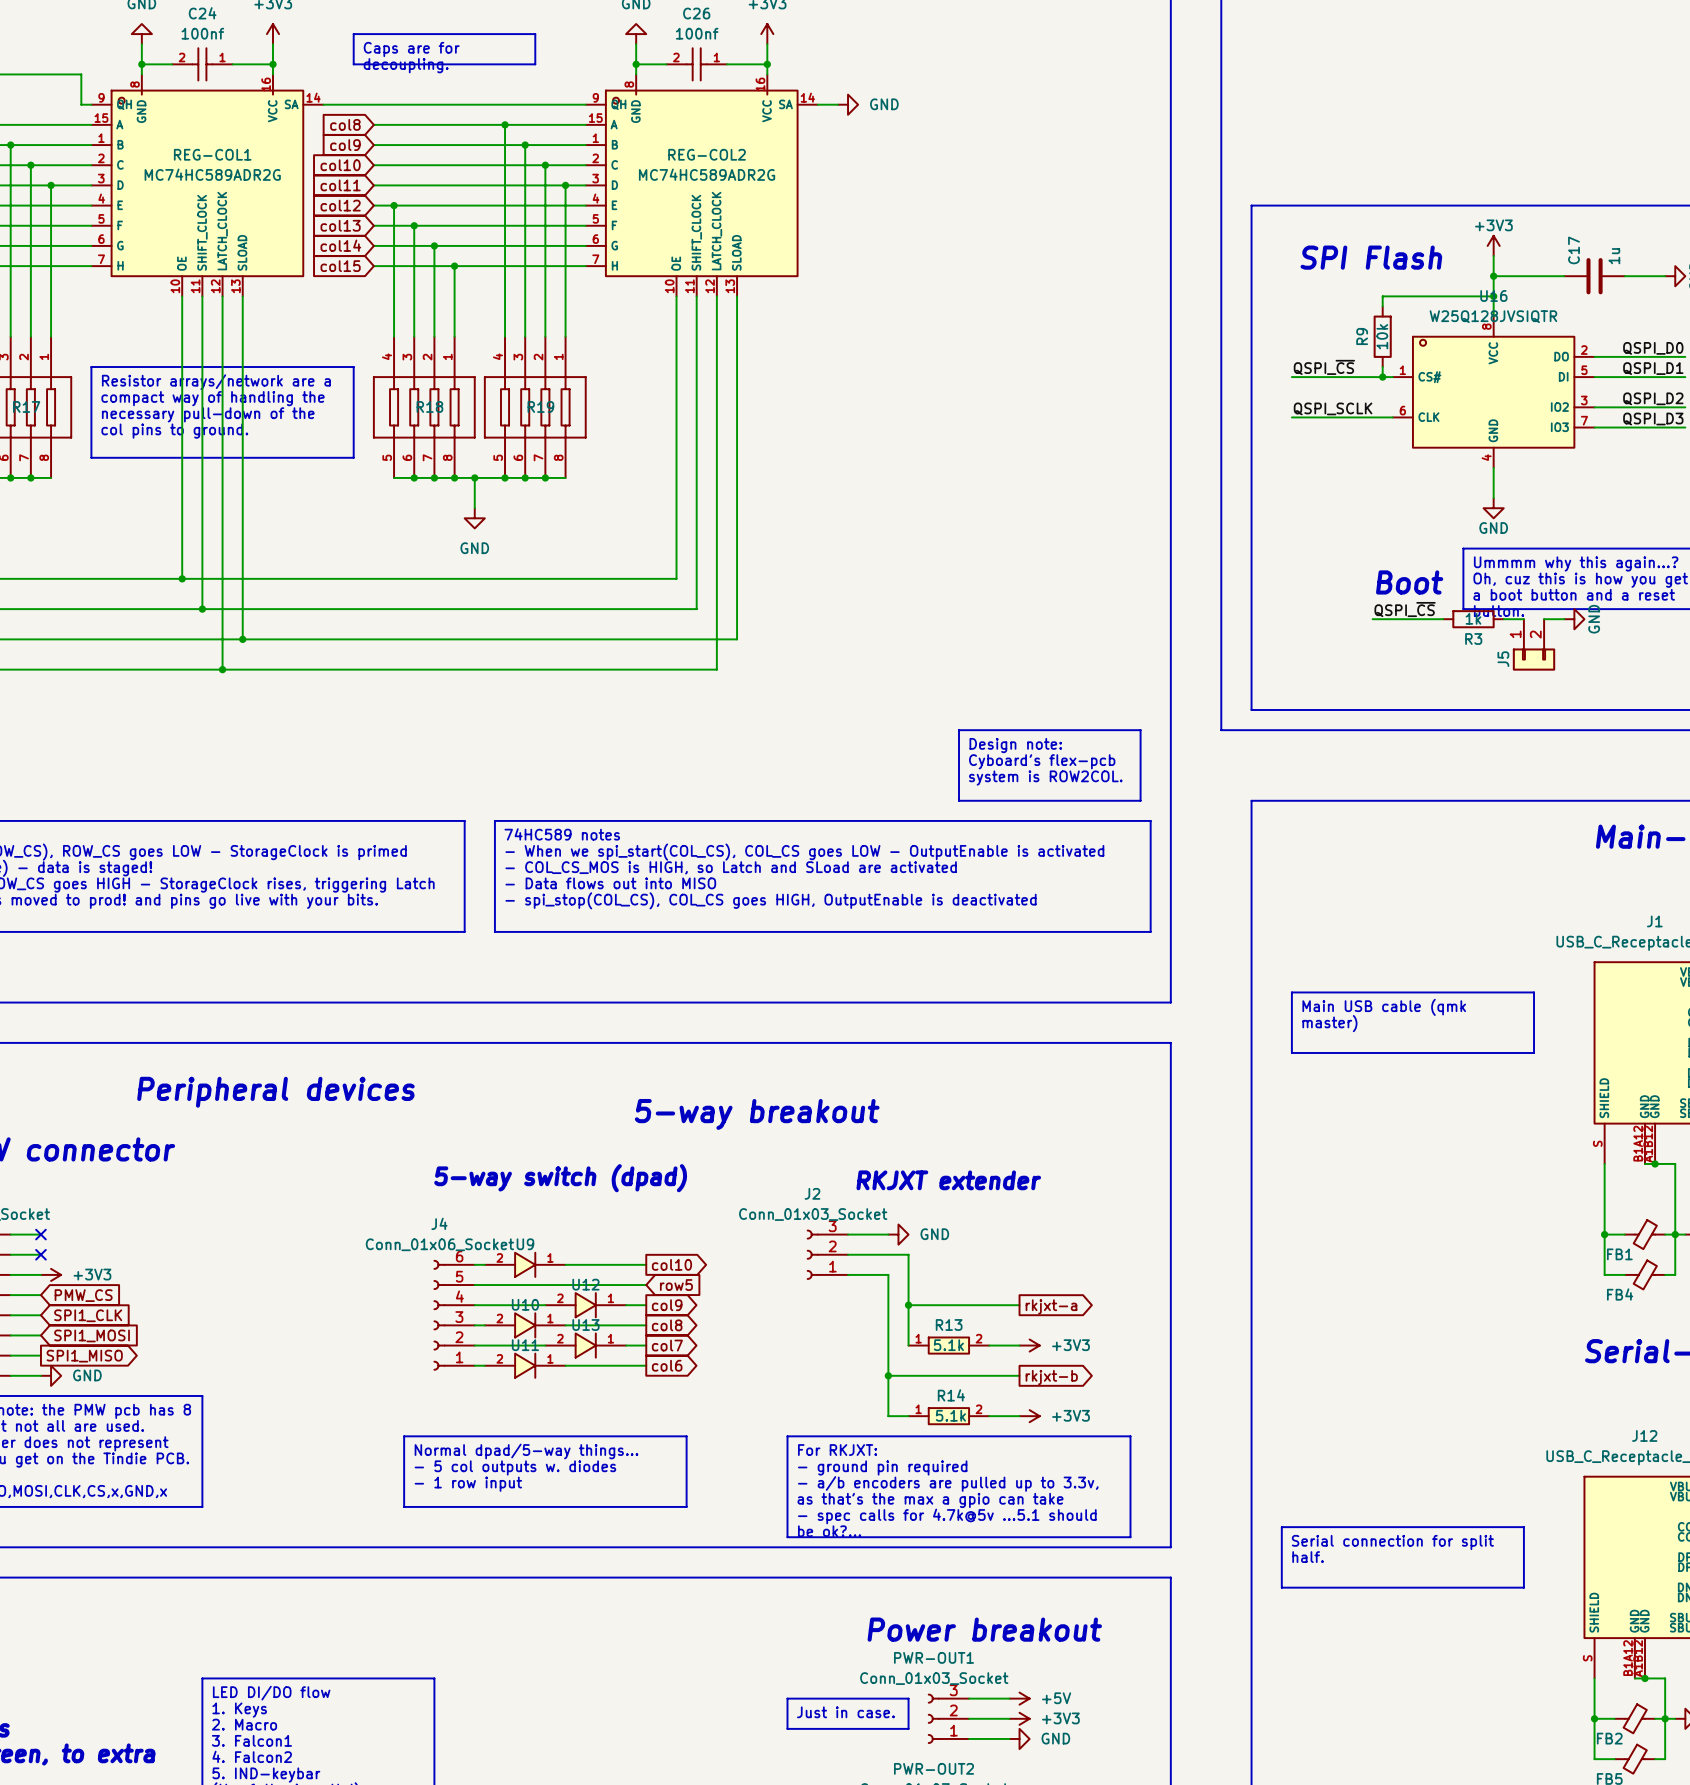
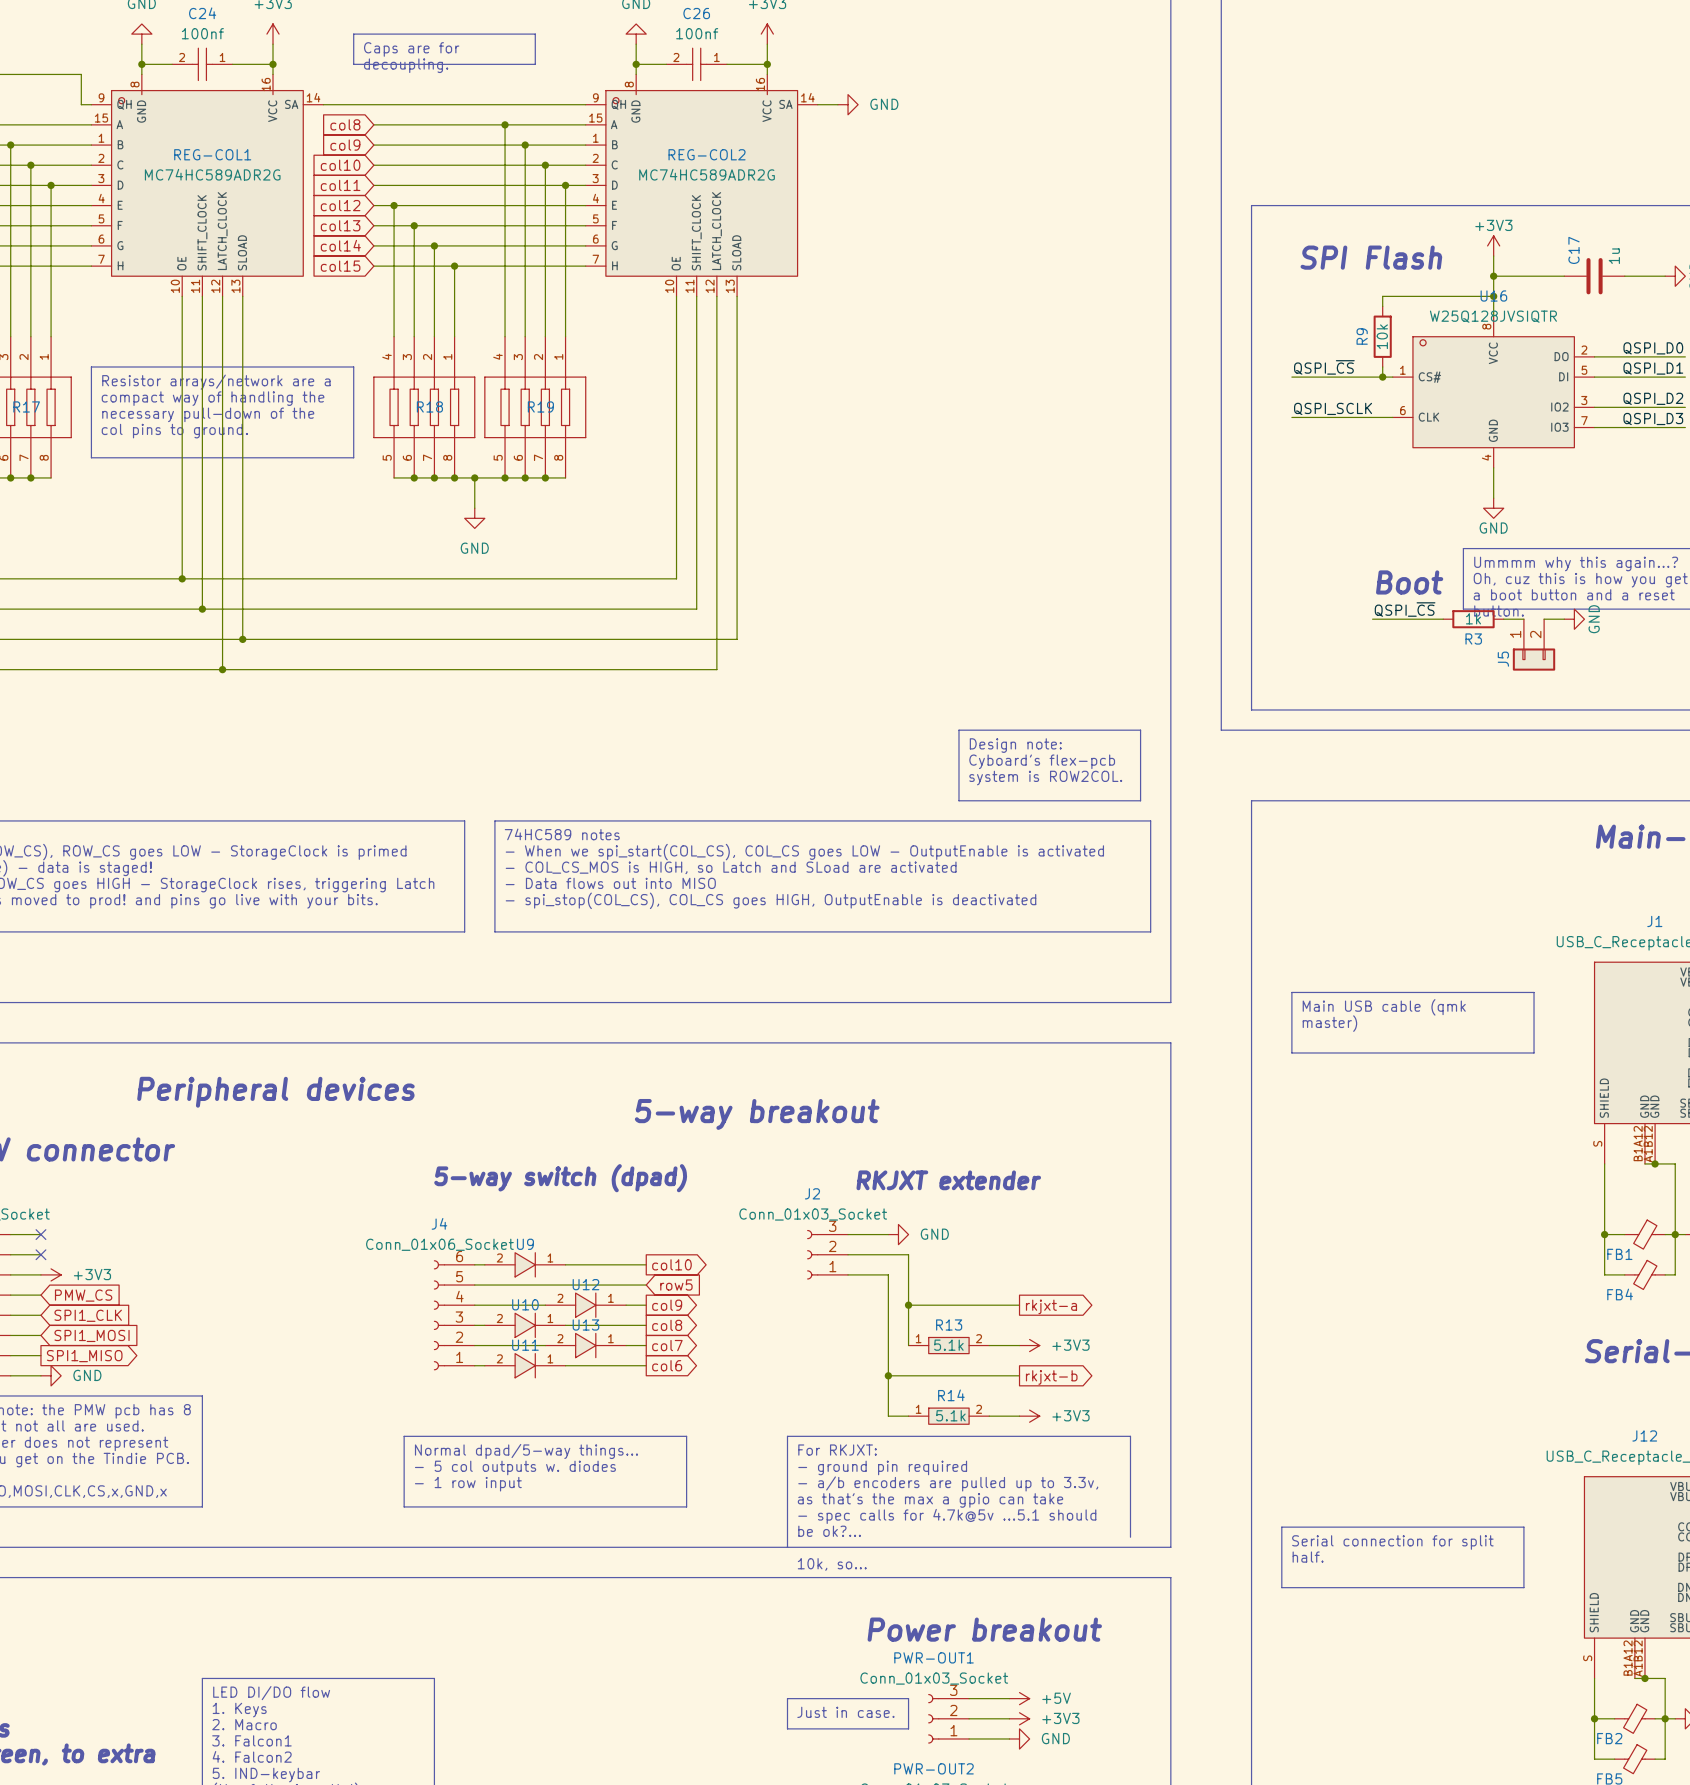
line: (787, 1537) (1130, 1537) -> (787, 1537) (787, 1547)
text: none -> 10k, so... (832, 1564)

